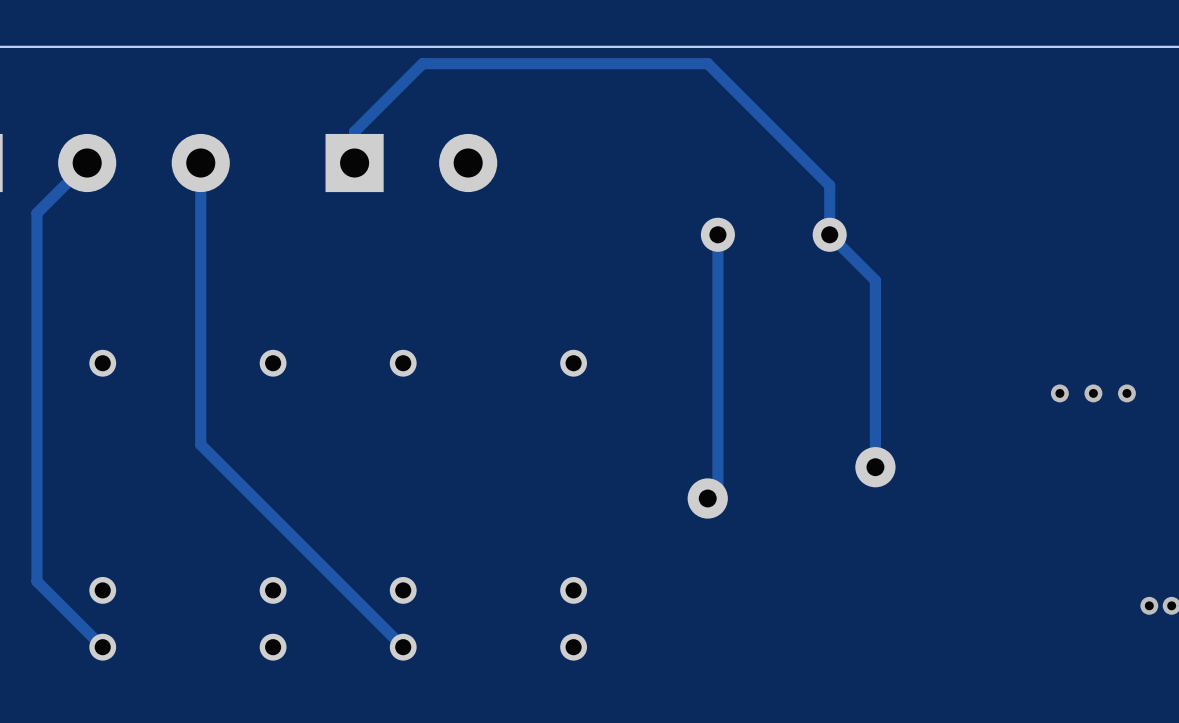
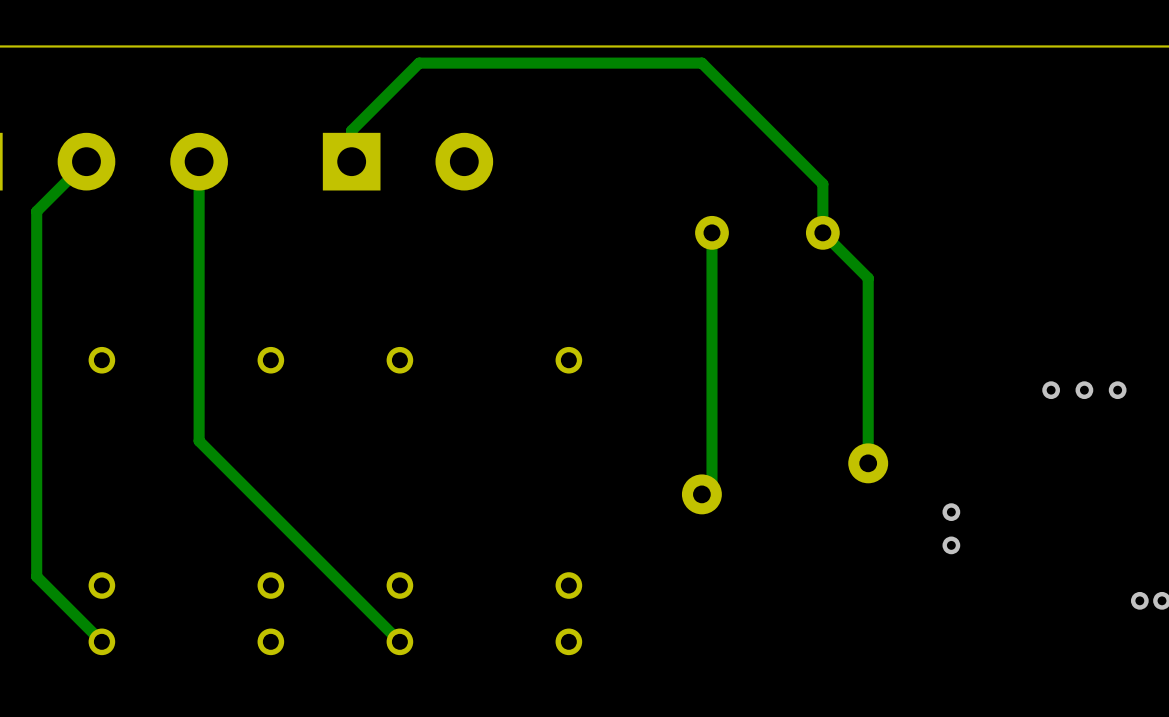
via: none -> (951, 512)
via: none -> (951, 545)

